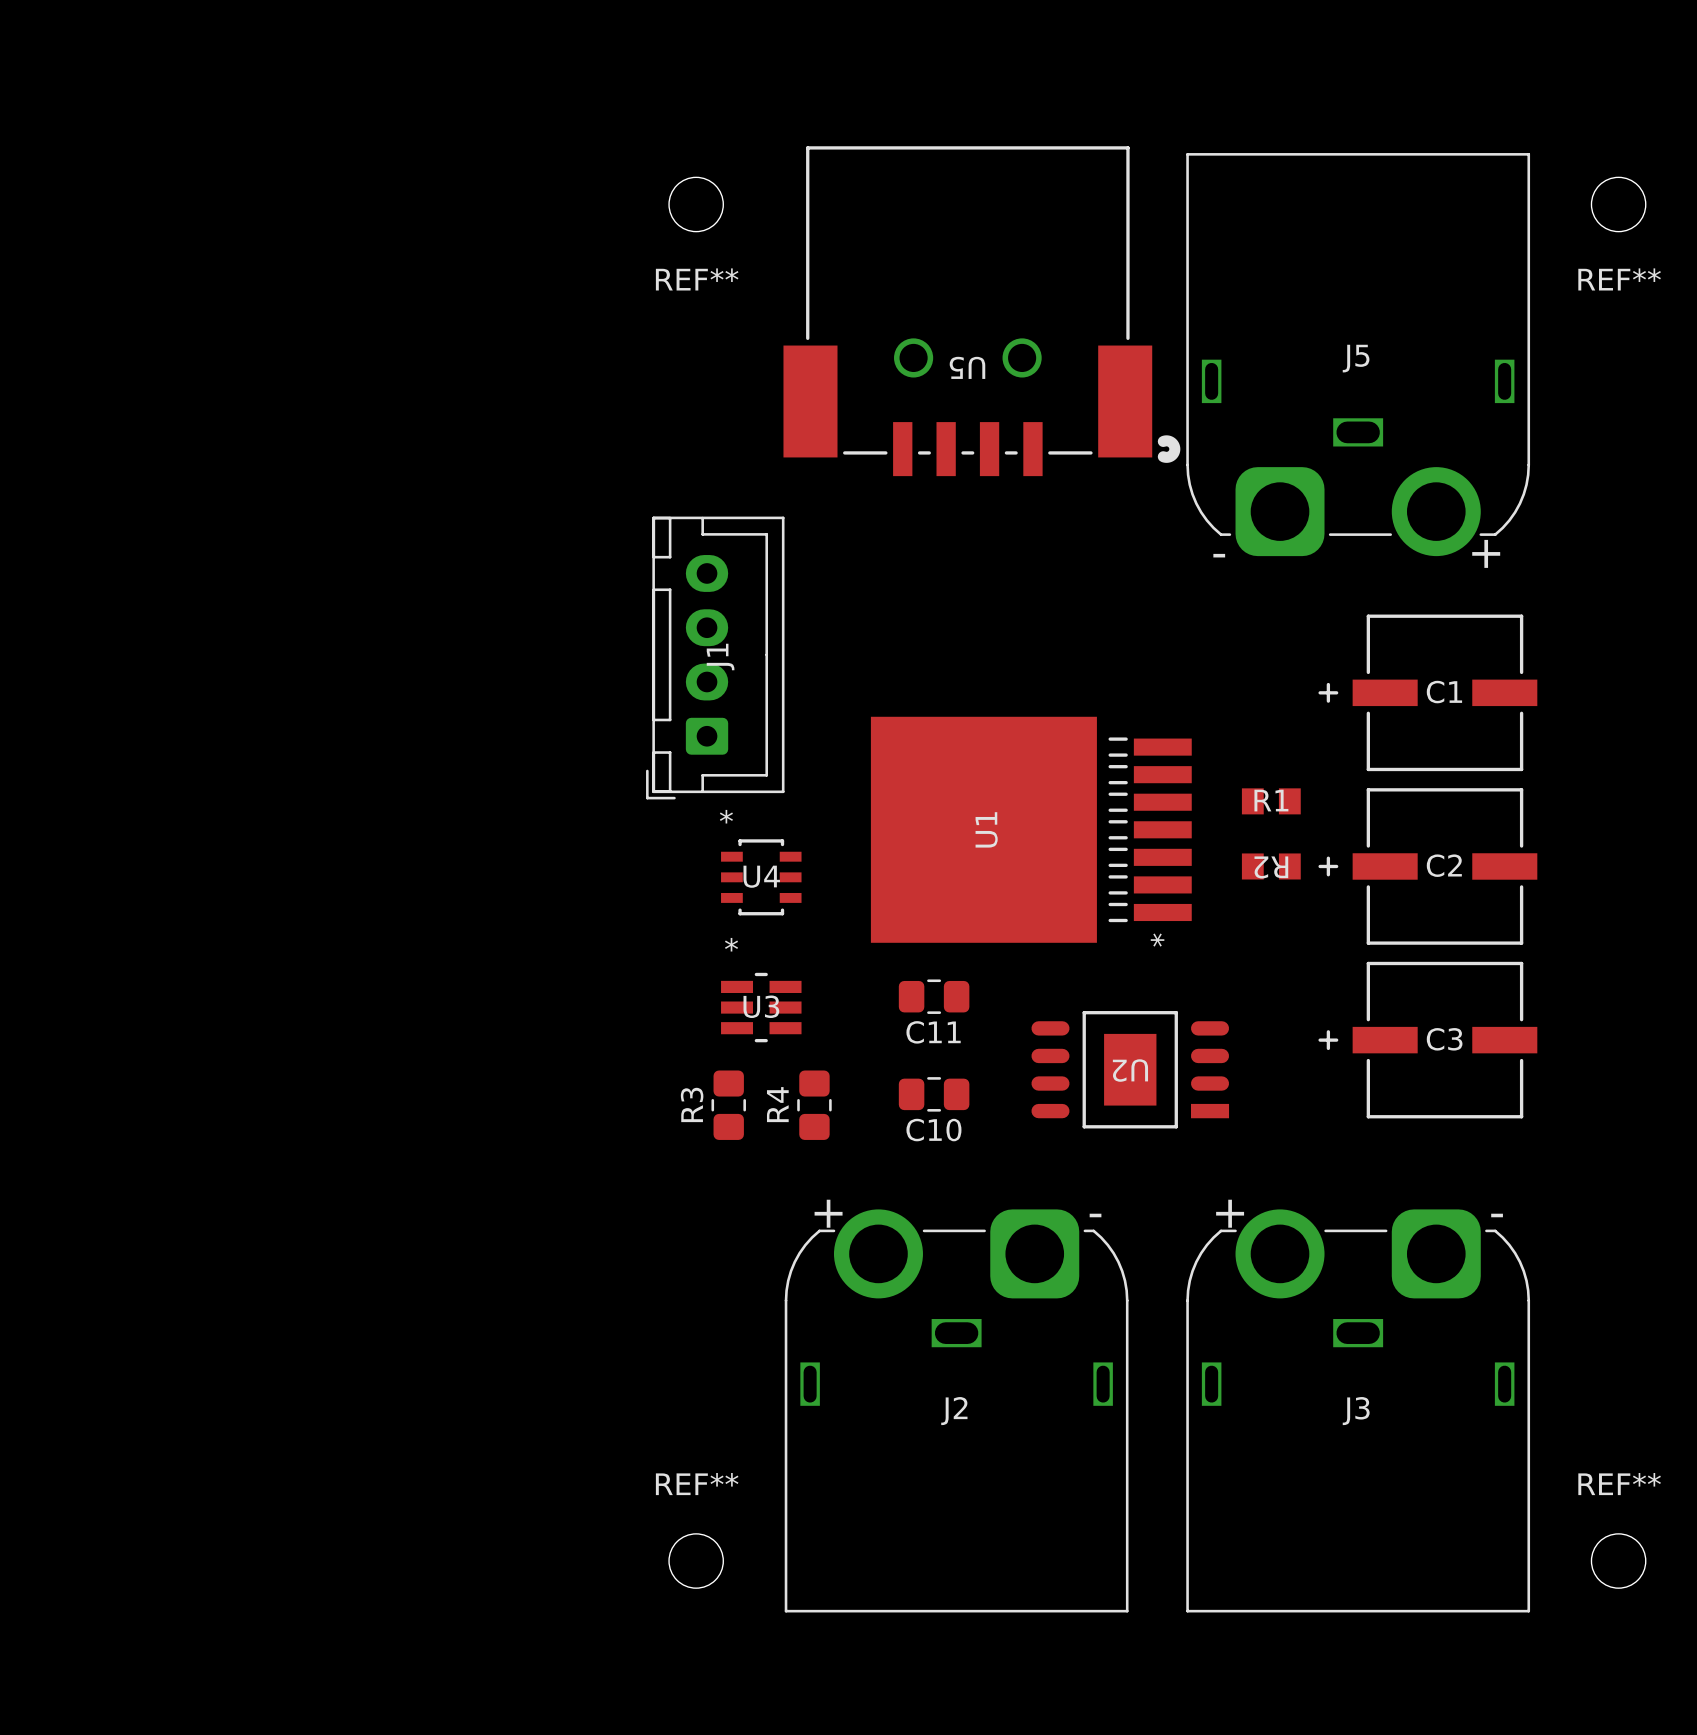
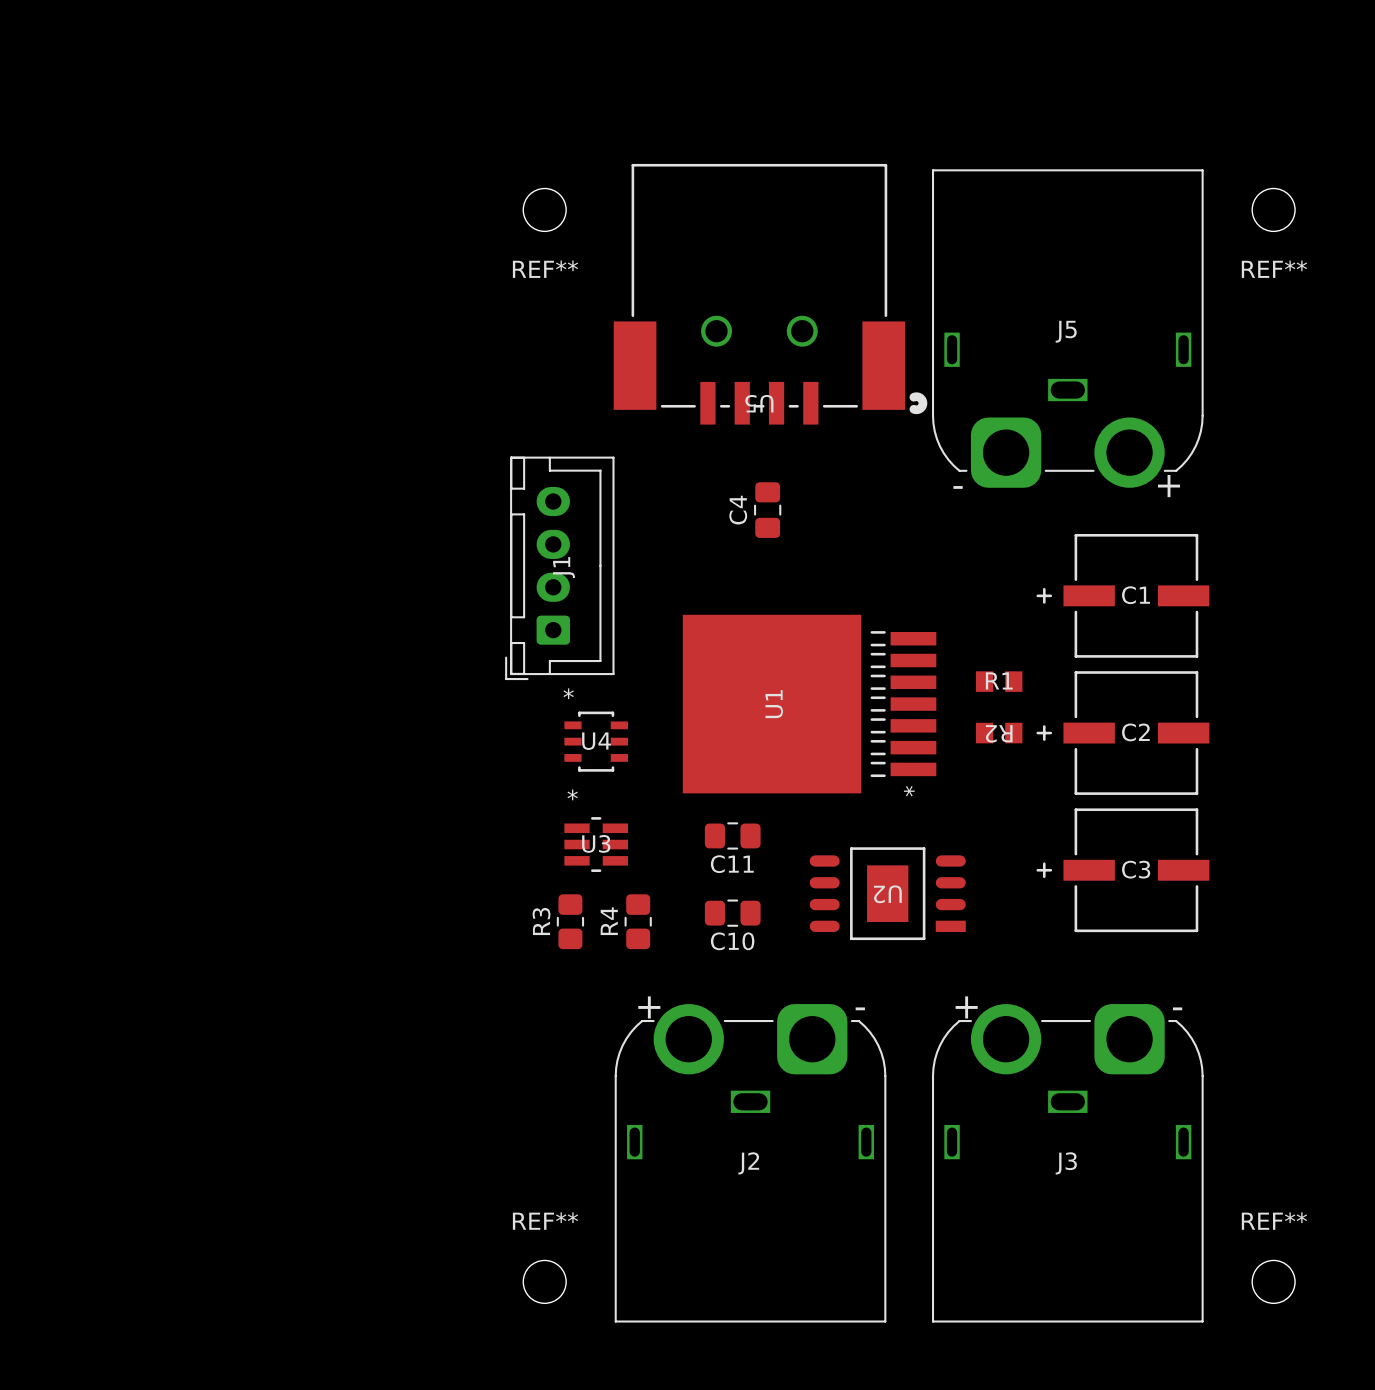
U5 name position: U5 (967, 367) -> U5 (759, 403)
C4: none -> (767, 510)

